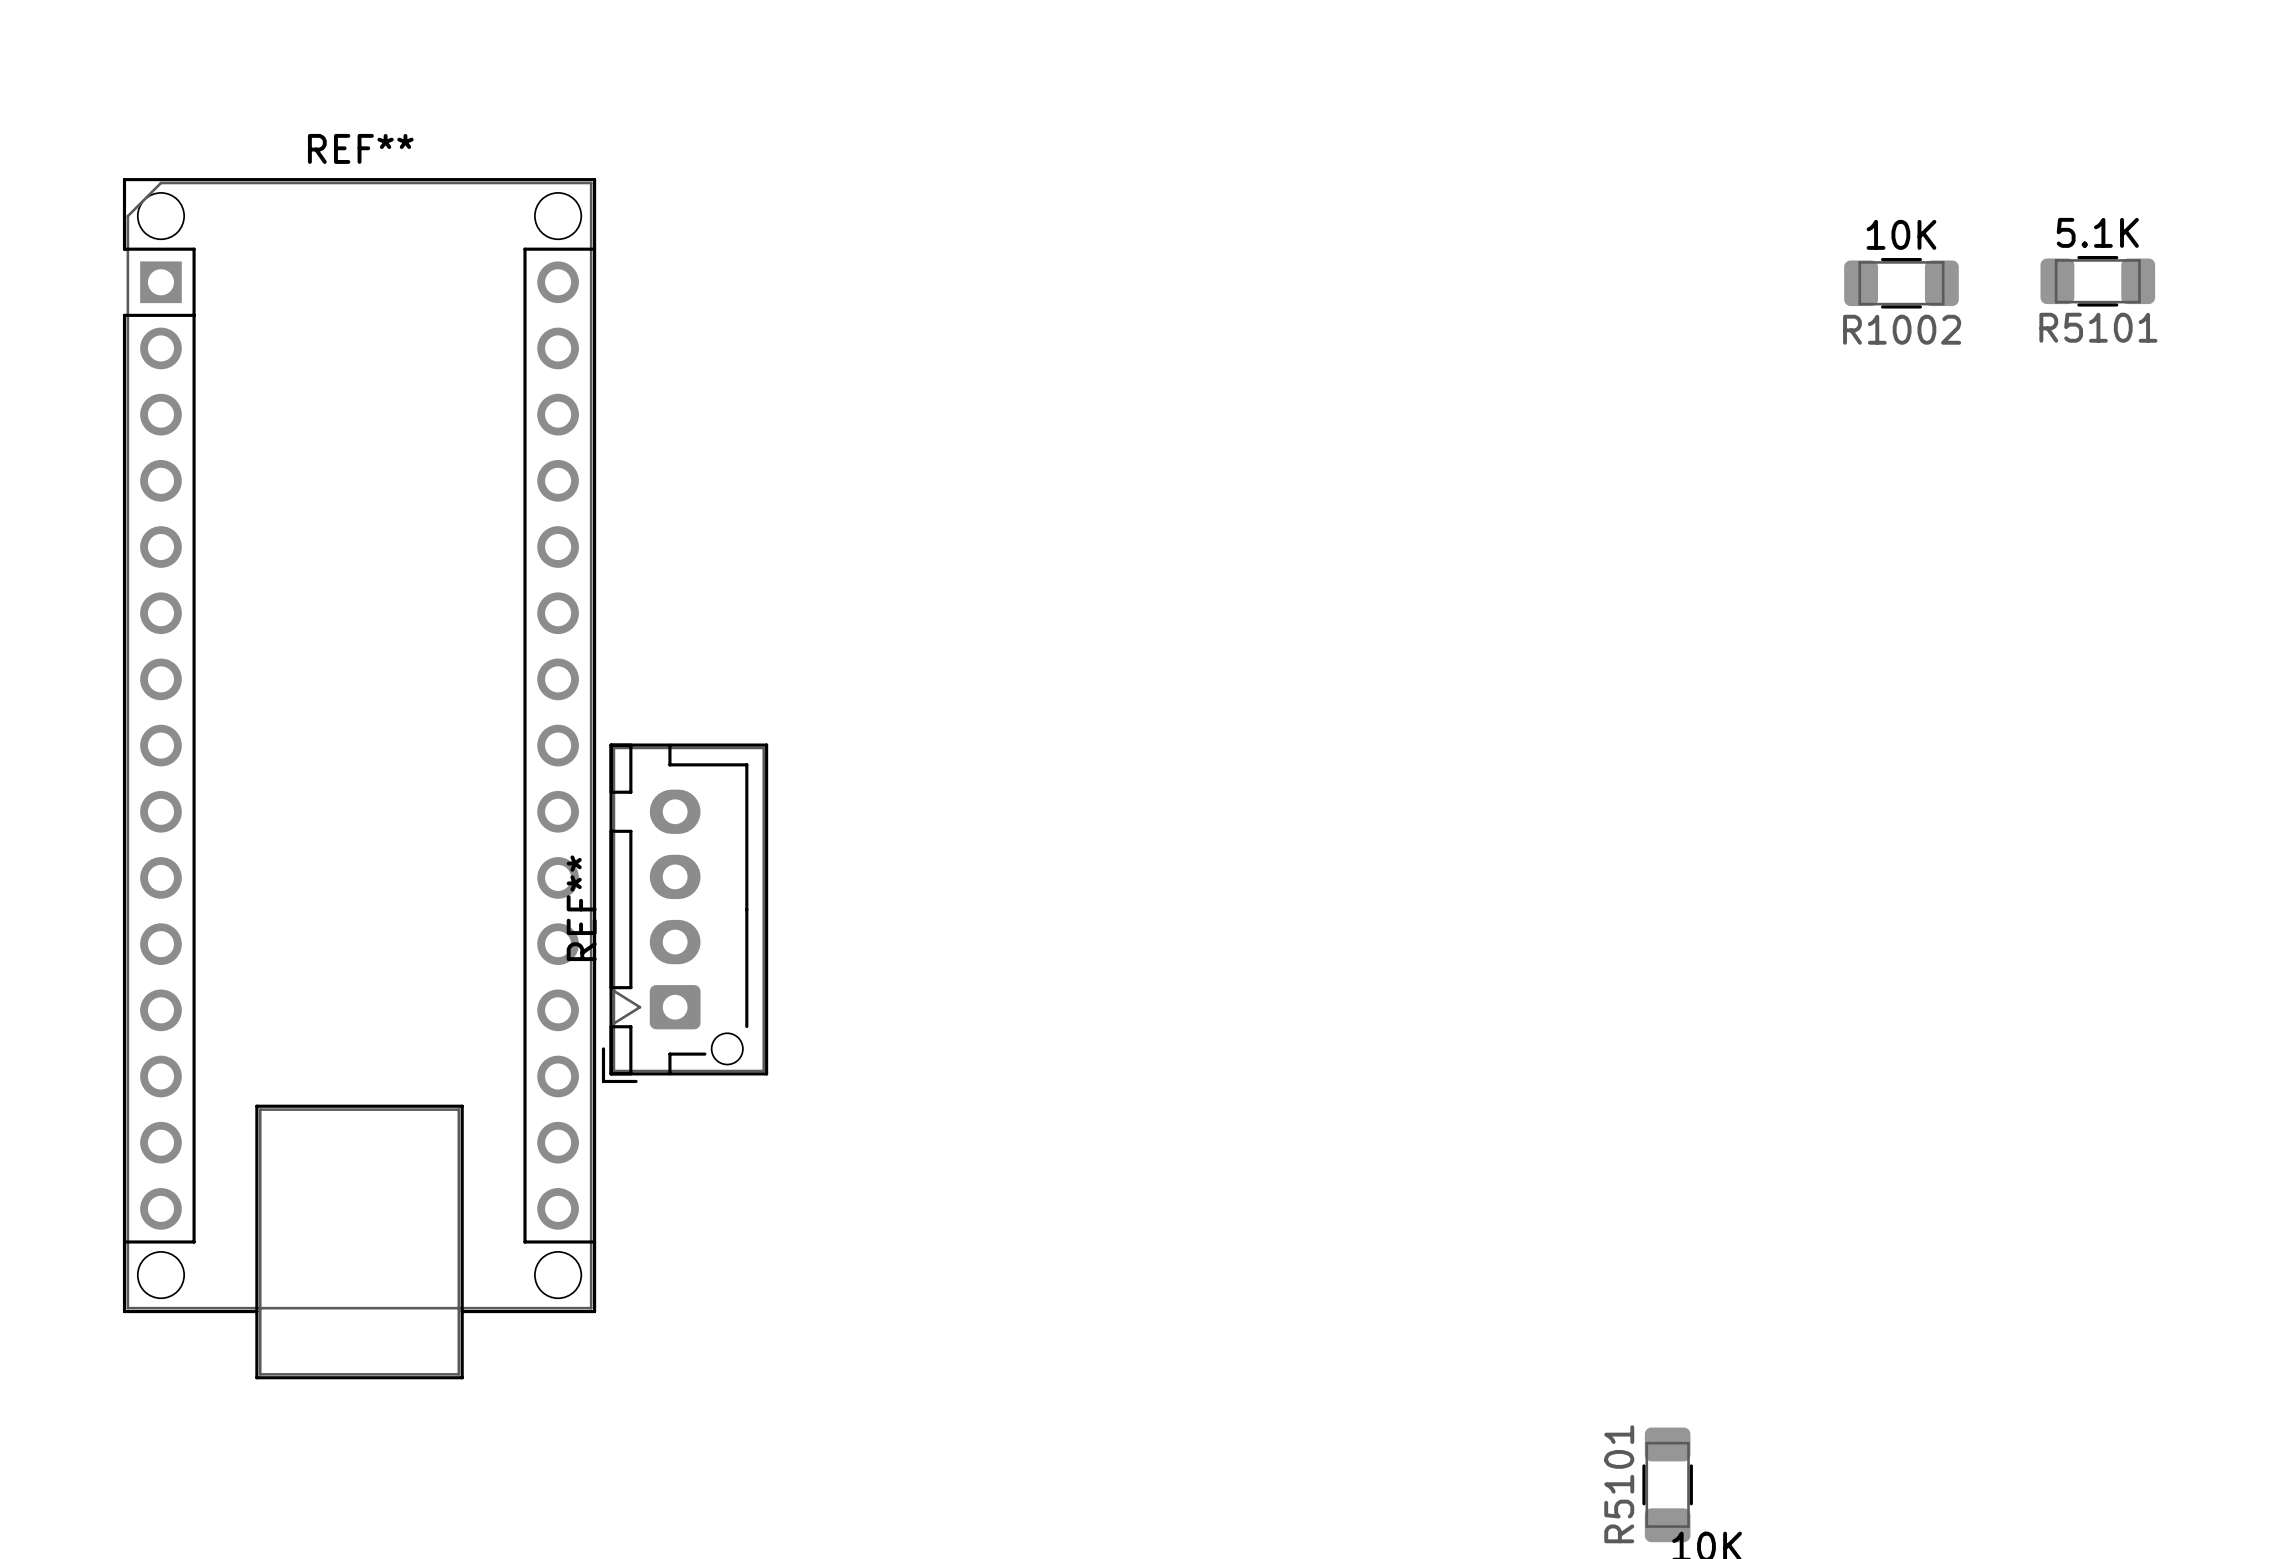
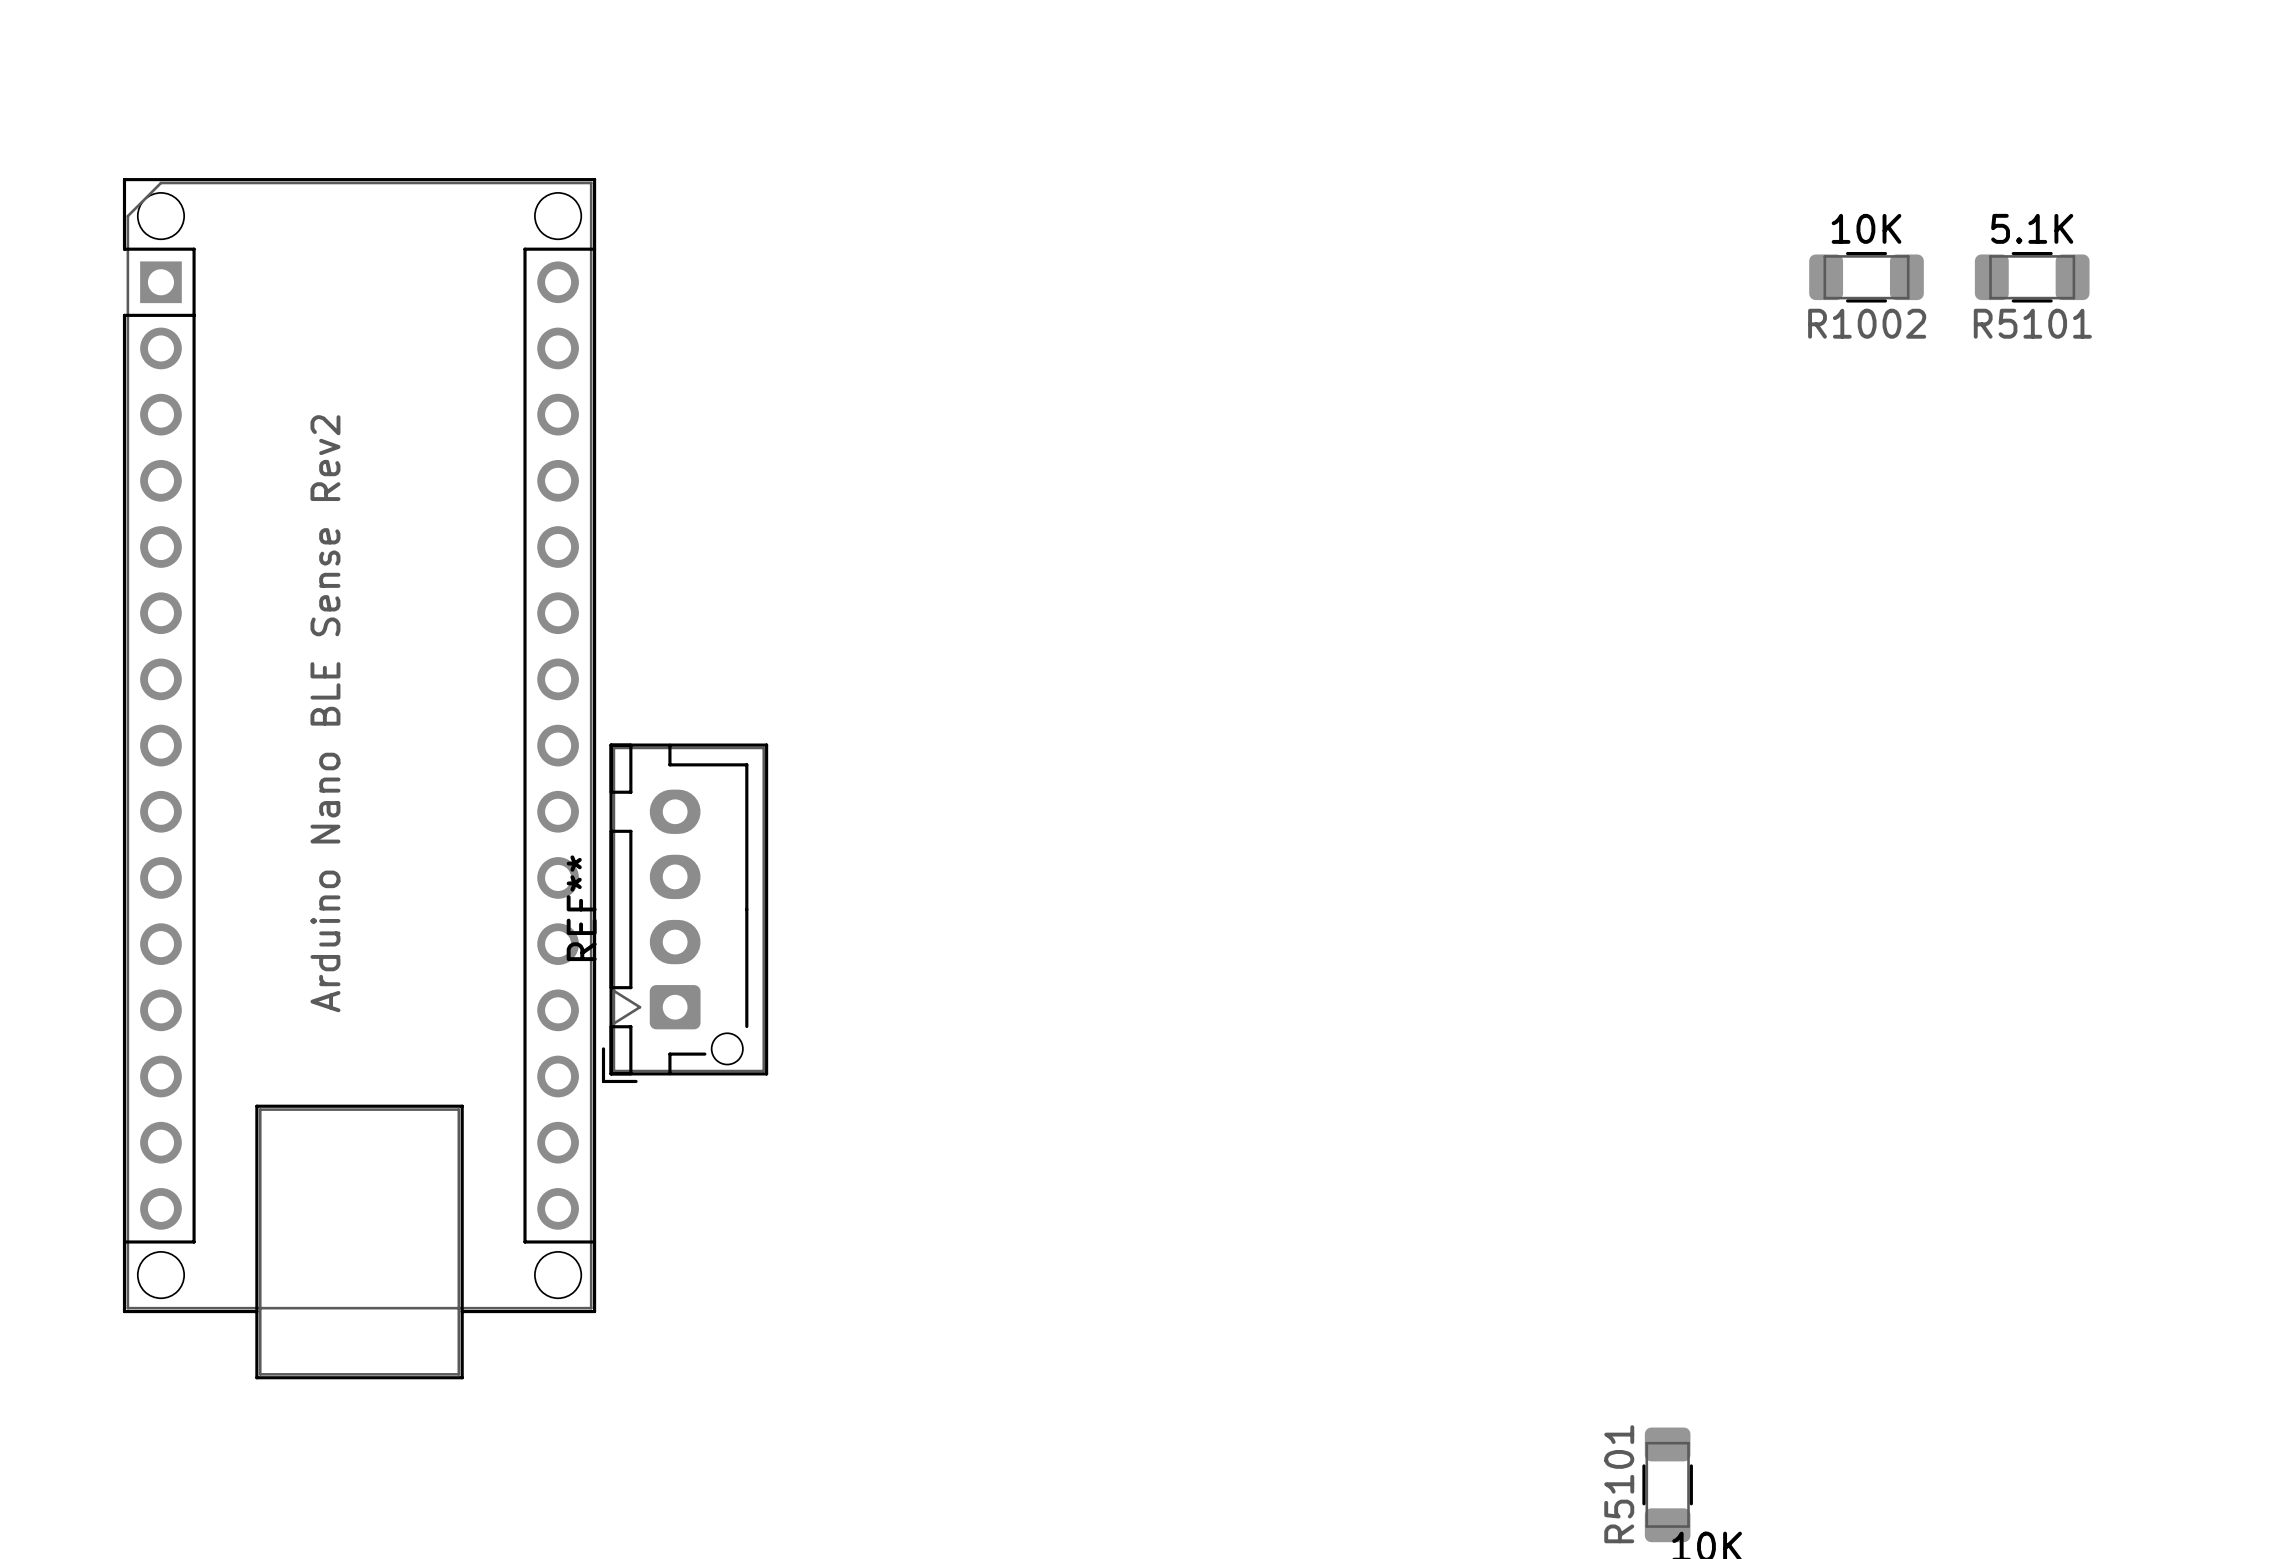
REF** name: REF** (360, 148) -> none
5.1K position: (2097, 281) -> (2032, 277)
10K position: (1901, 283) -> (1866, 277)
REF** text: none -> Arduino Nano BLE Sense Rev2 (325, 713)

